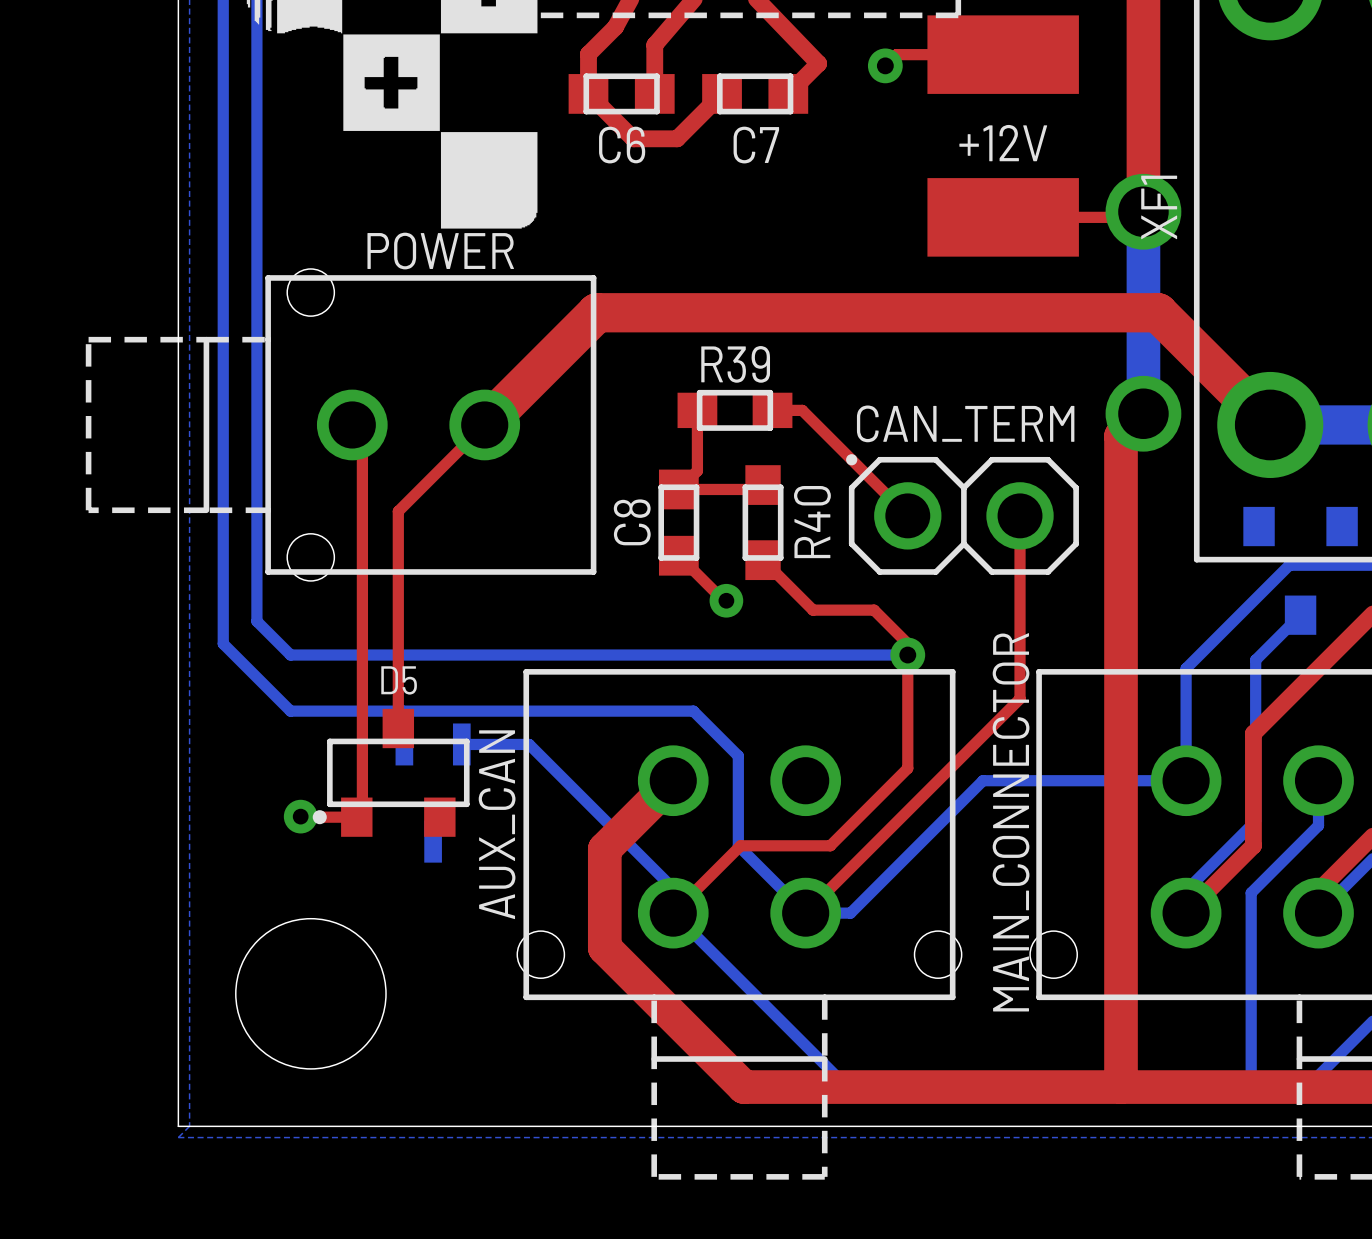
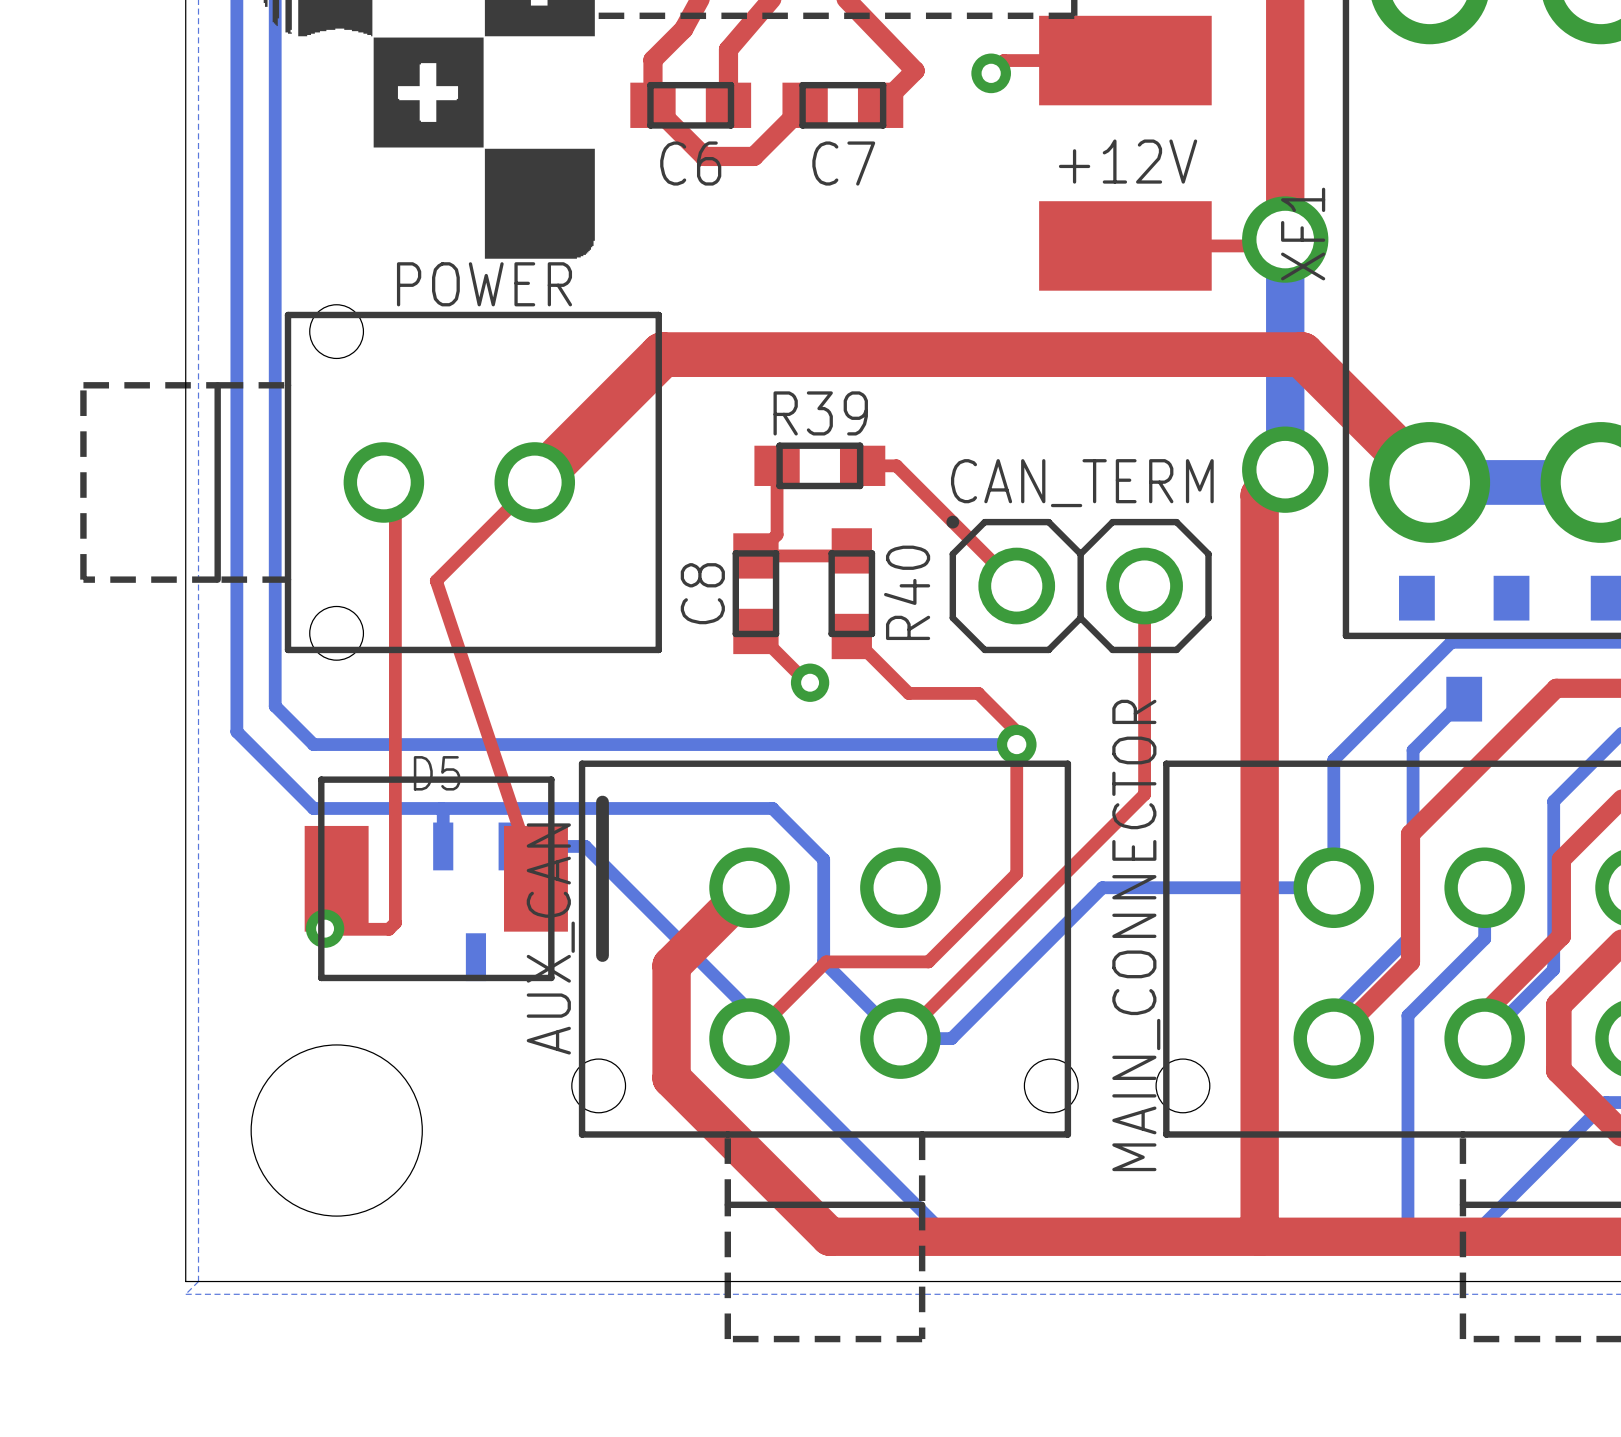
top track: (398, 511) (398, 728) -> (436, 580) (535, 878)
D5 footprint: [312, 708, 470, 837] -> [304, 776, 609, 982]

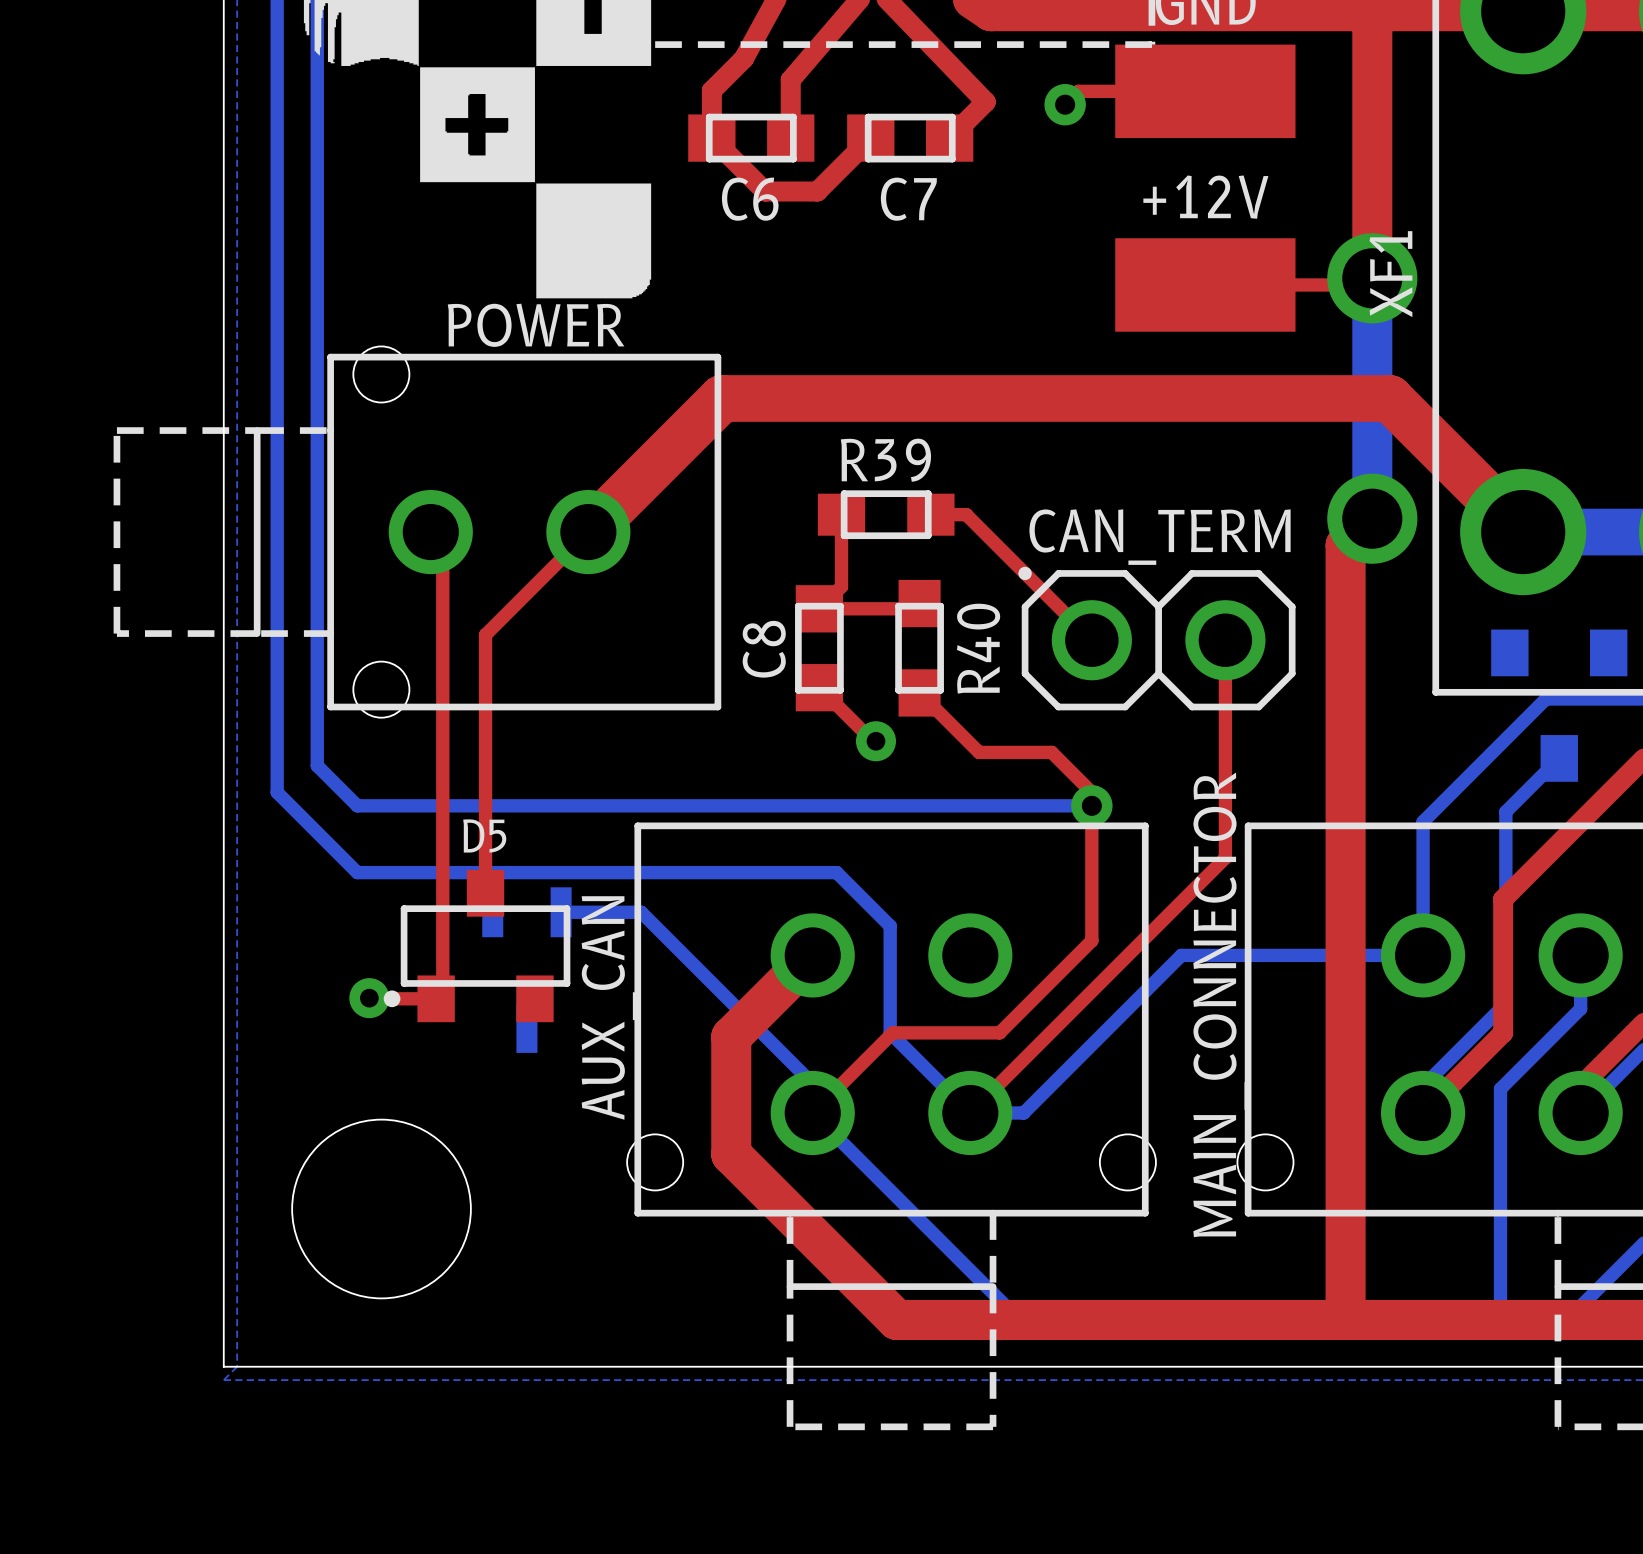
top track: (436, 580) (535, 878) -> (485, 634) (485, 893)
D5 footprint: [304, 776, 609, 982] -> [383, 869, 571, 1023]

